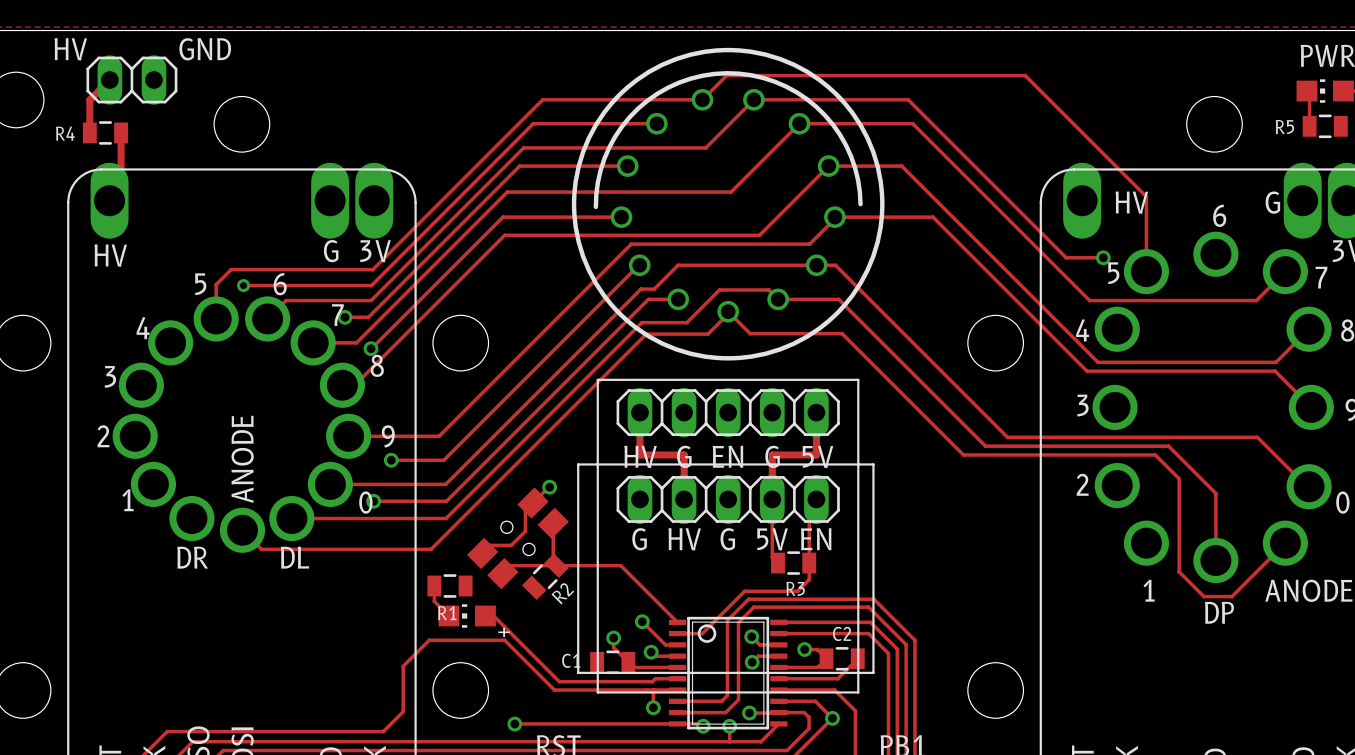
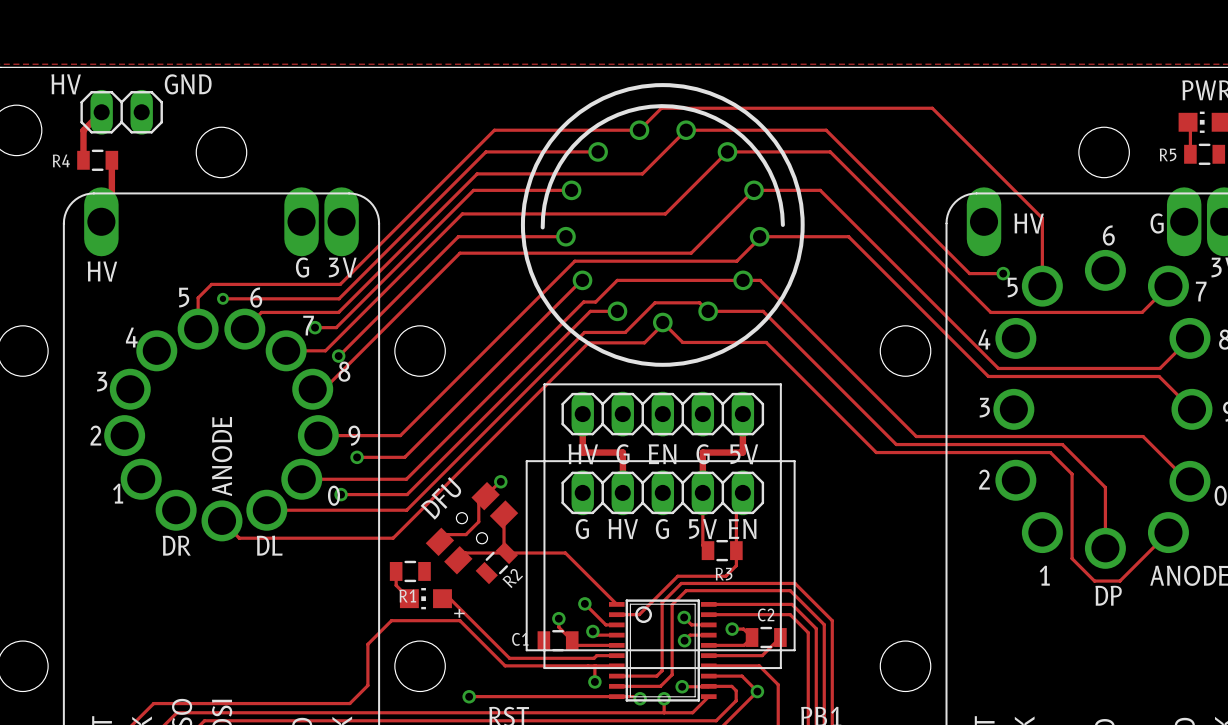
text: none -> DFU (440, 498)

